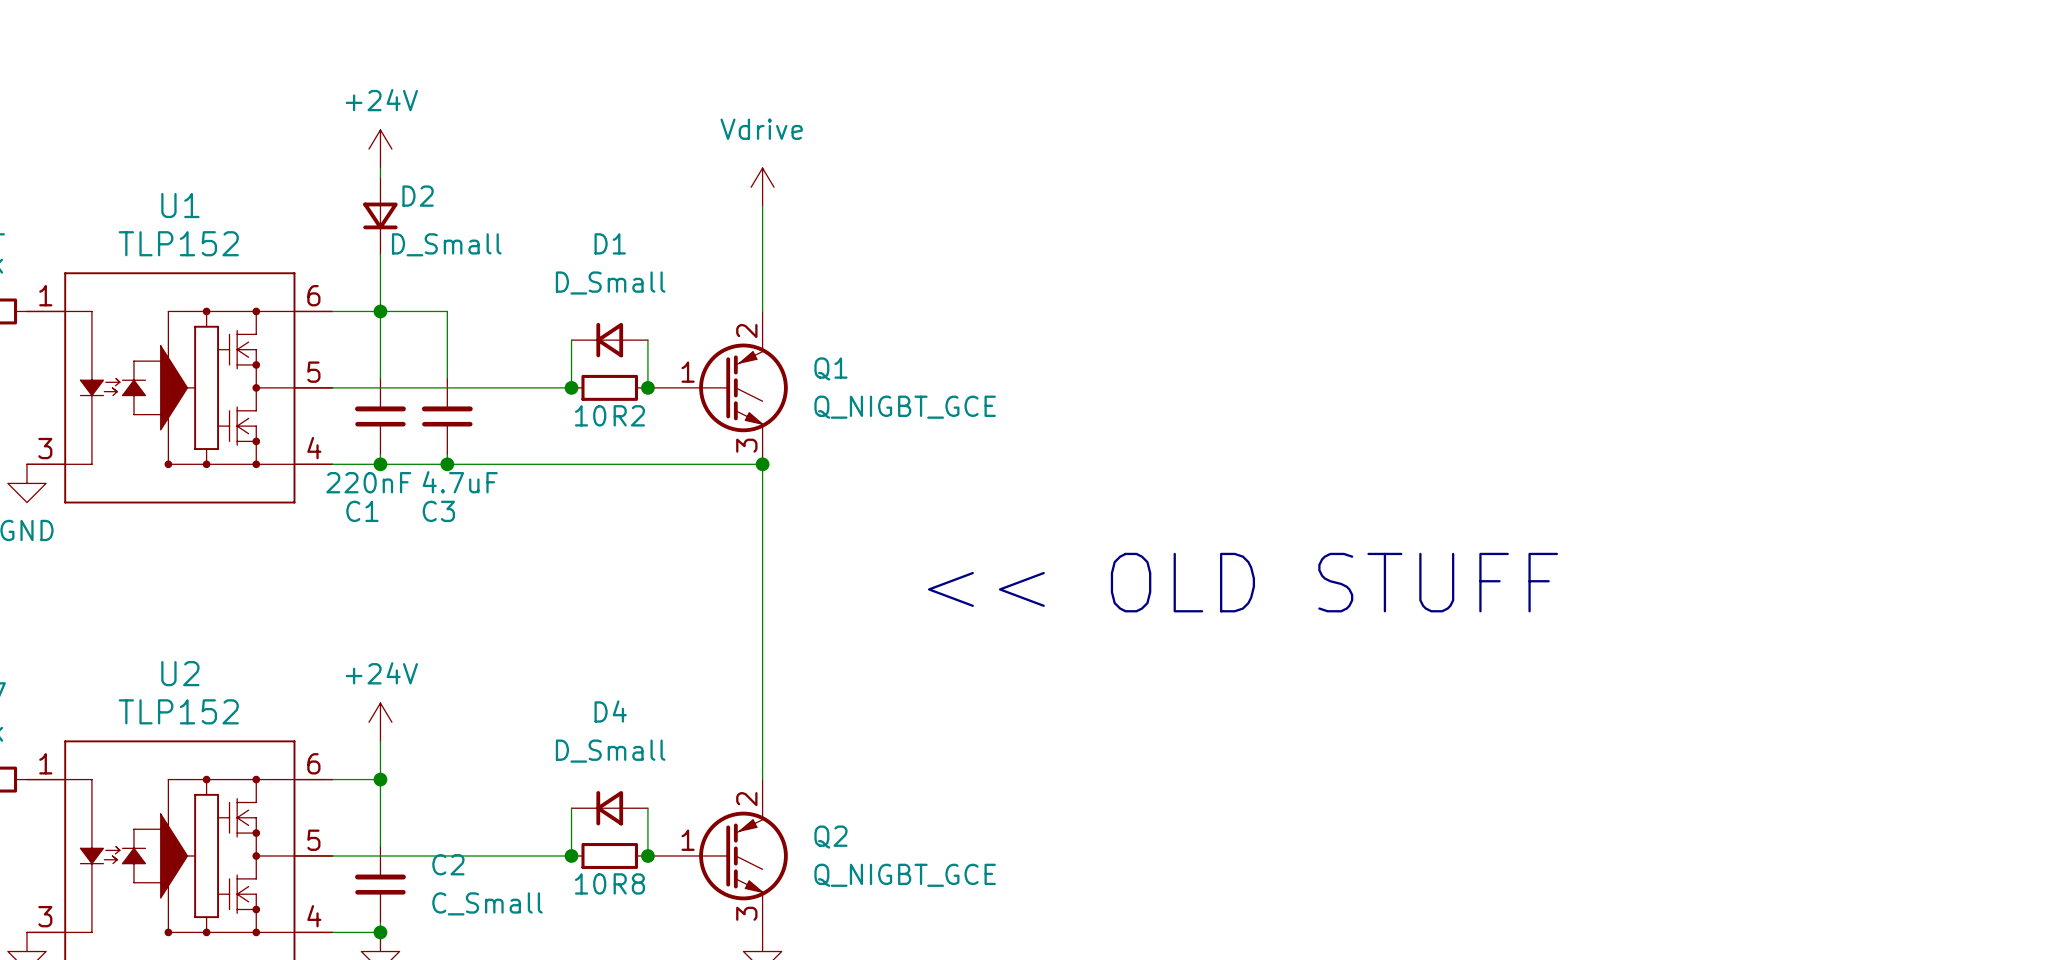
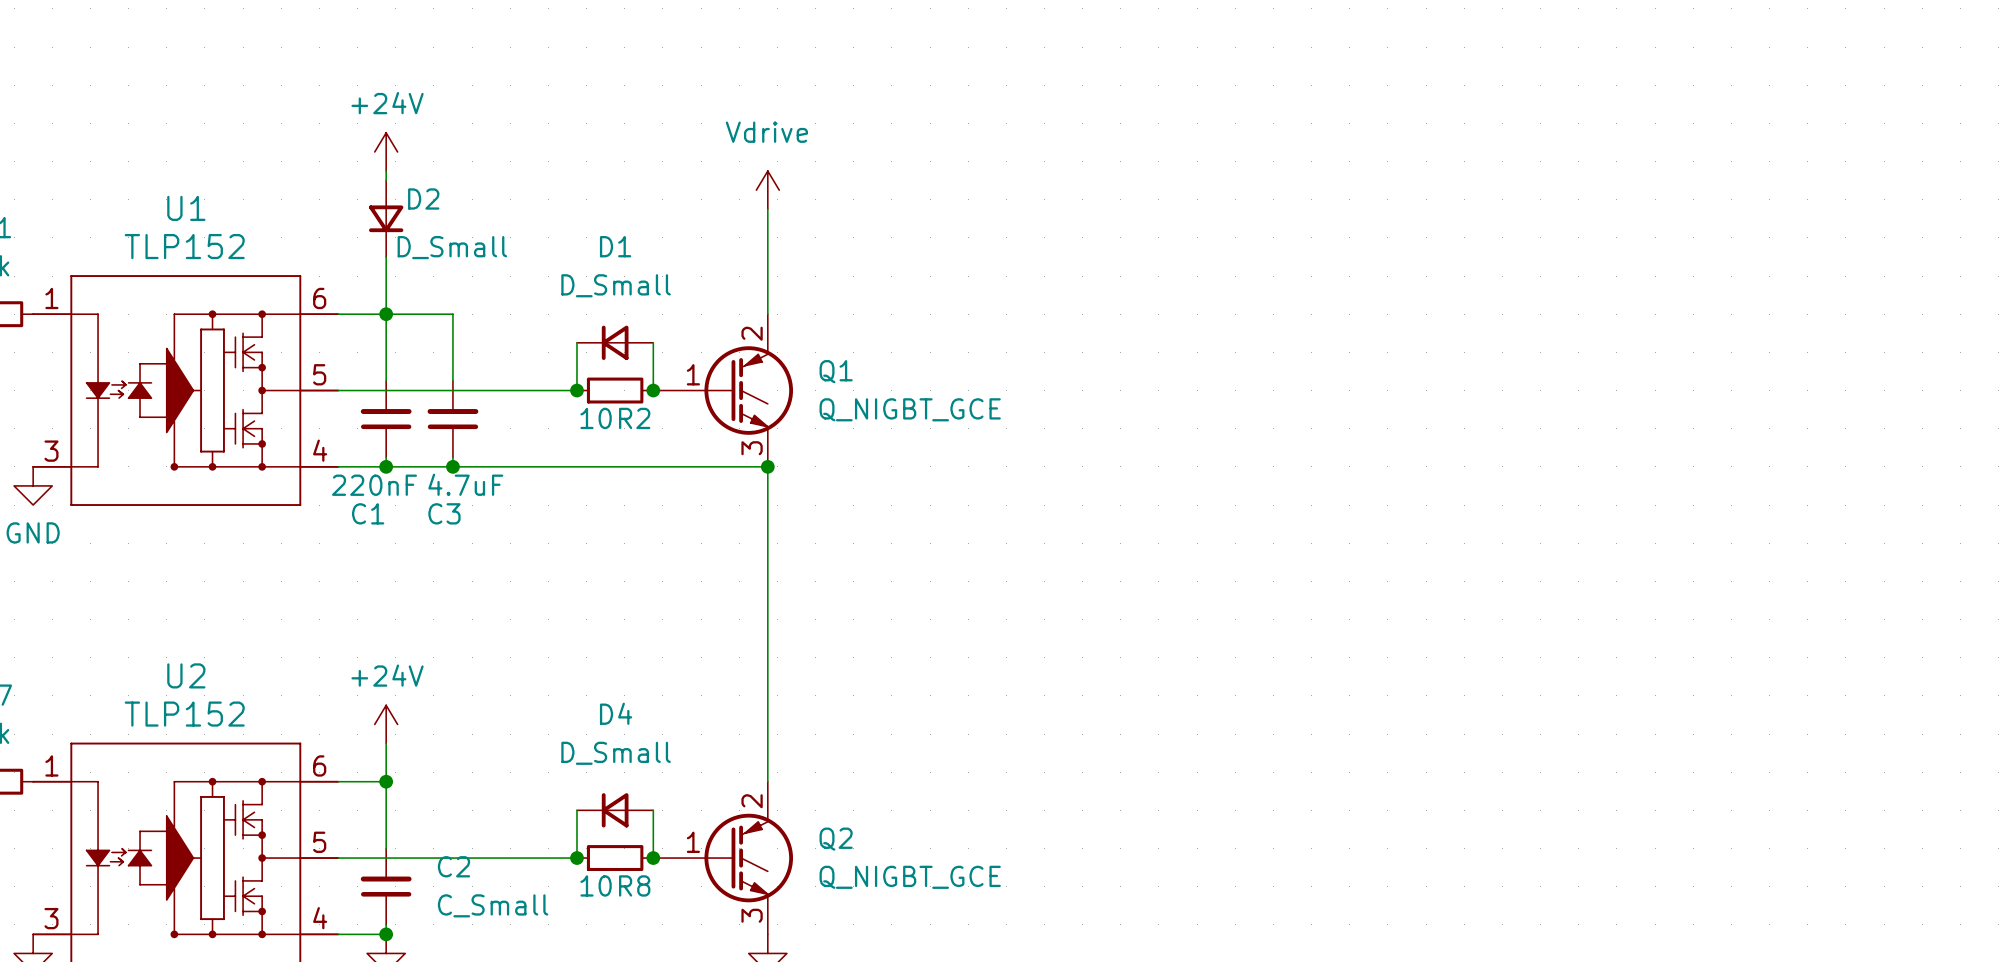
text: << OLD STUFF (1242, 582) -> none

